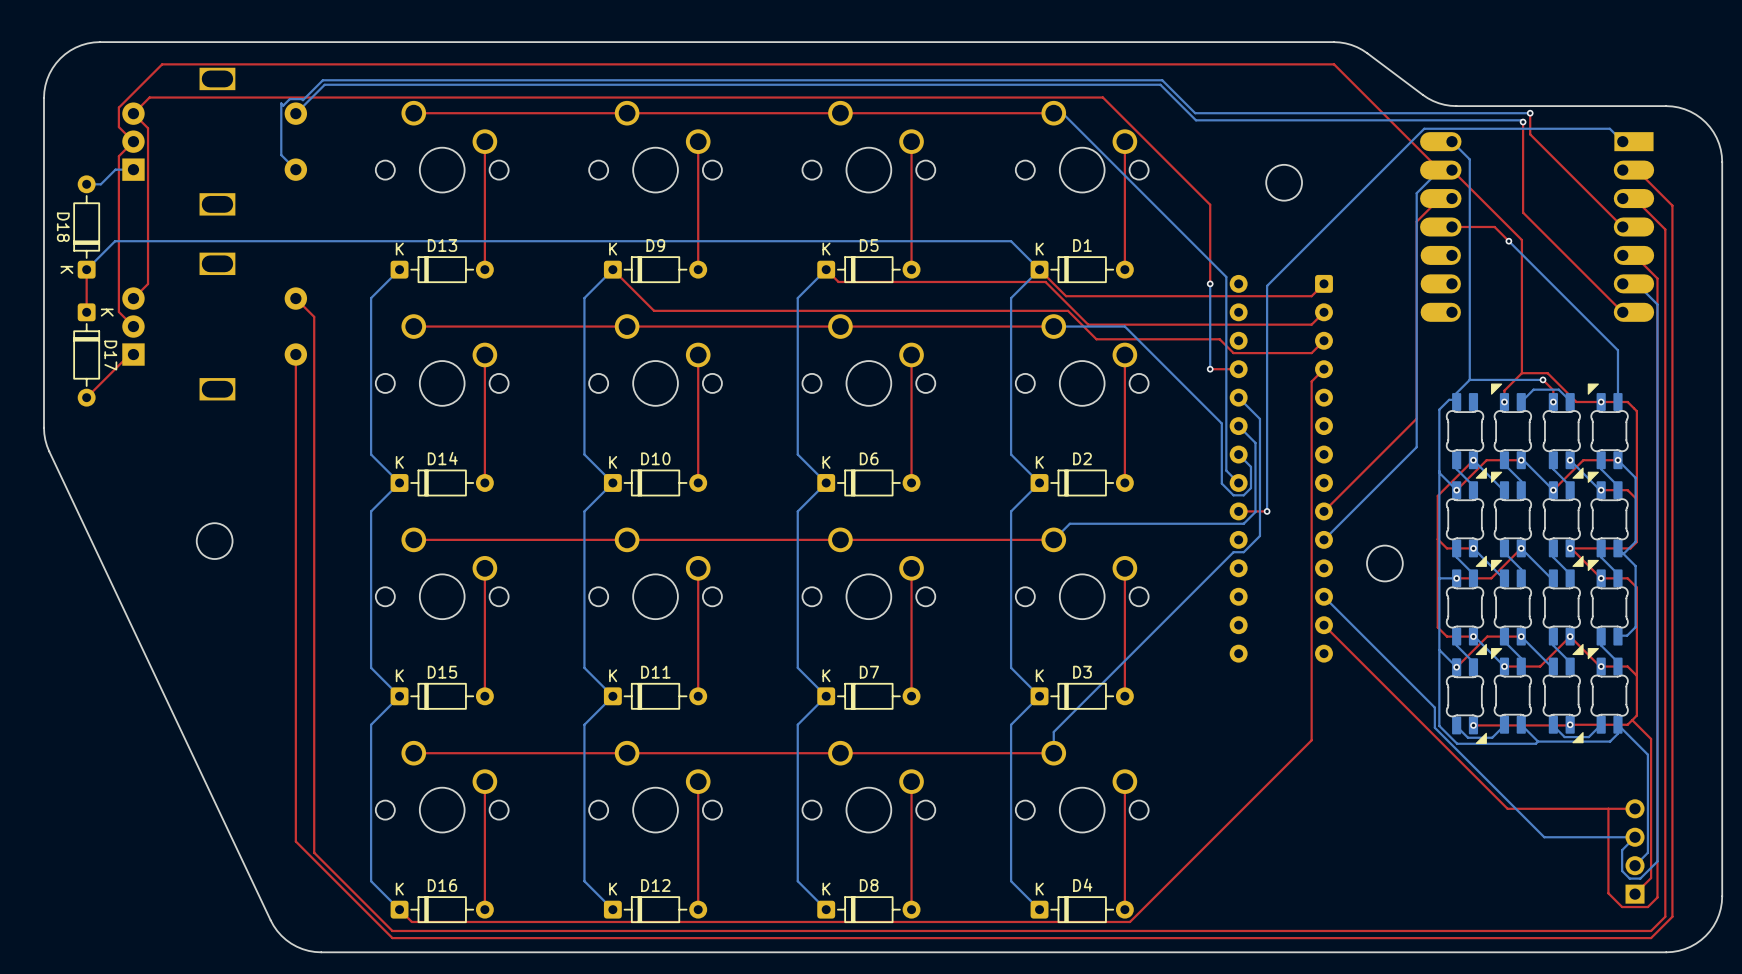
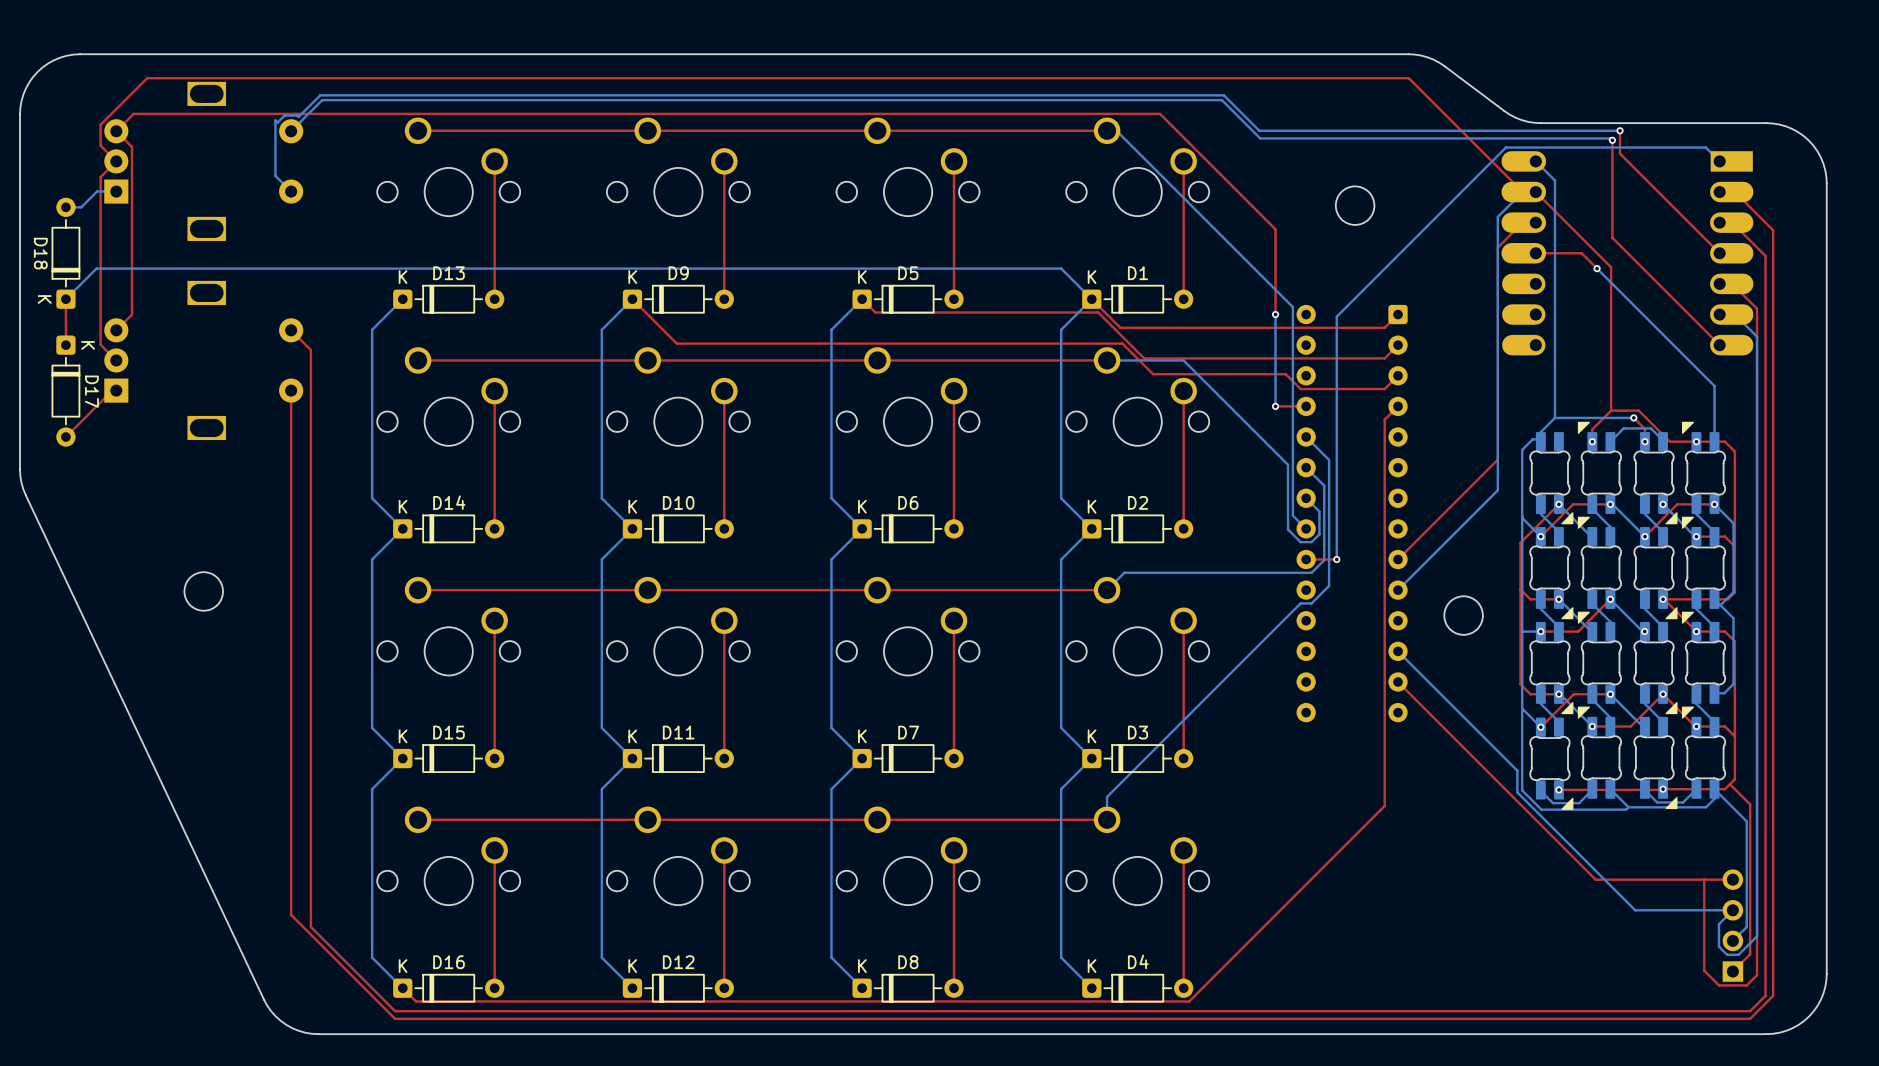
via: none -> (1644, 631)

